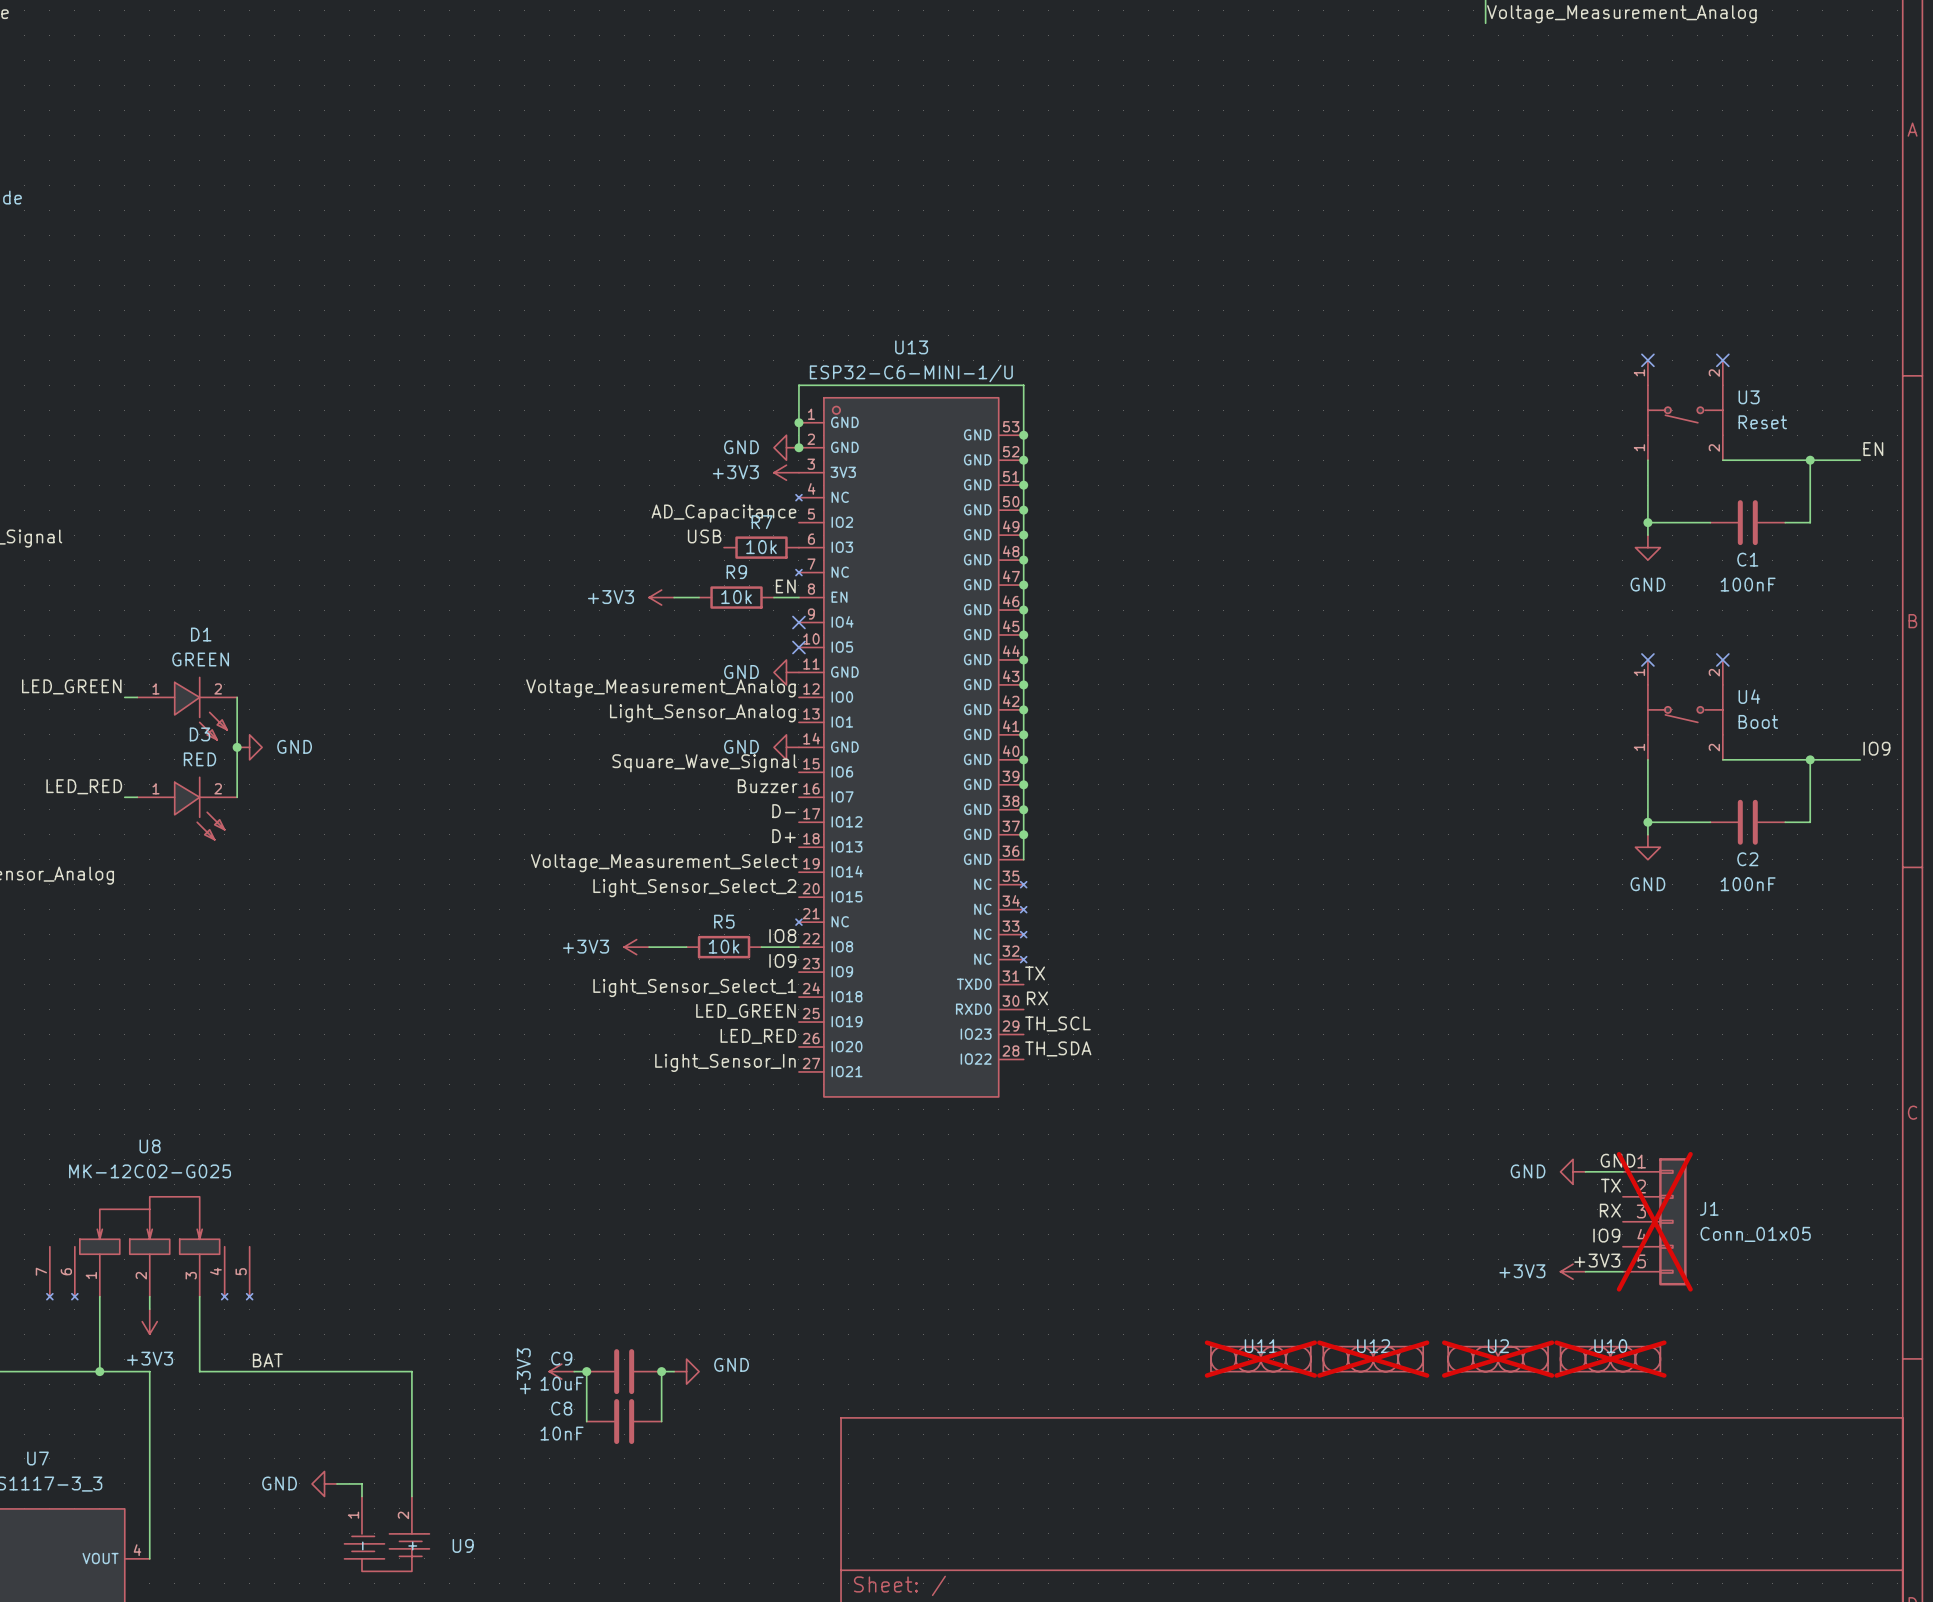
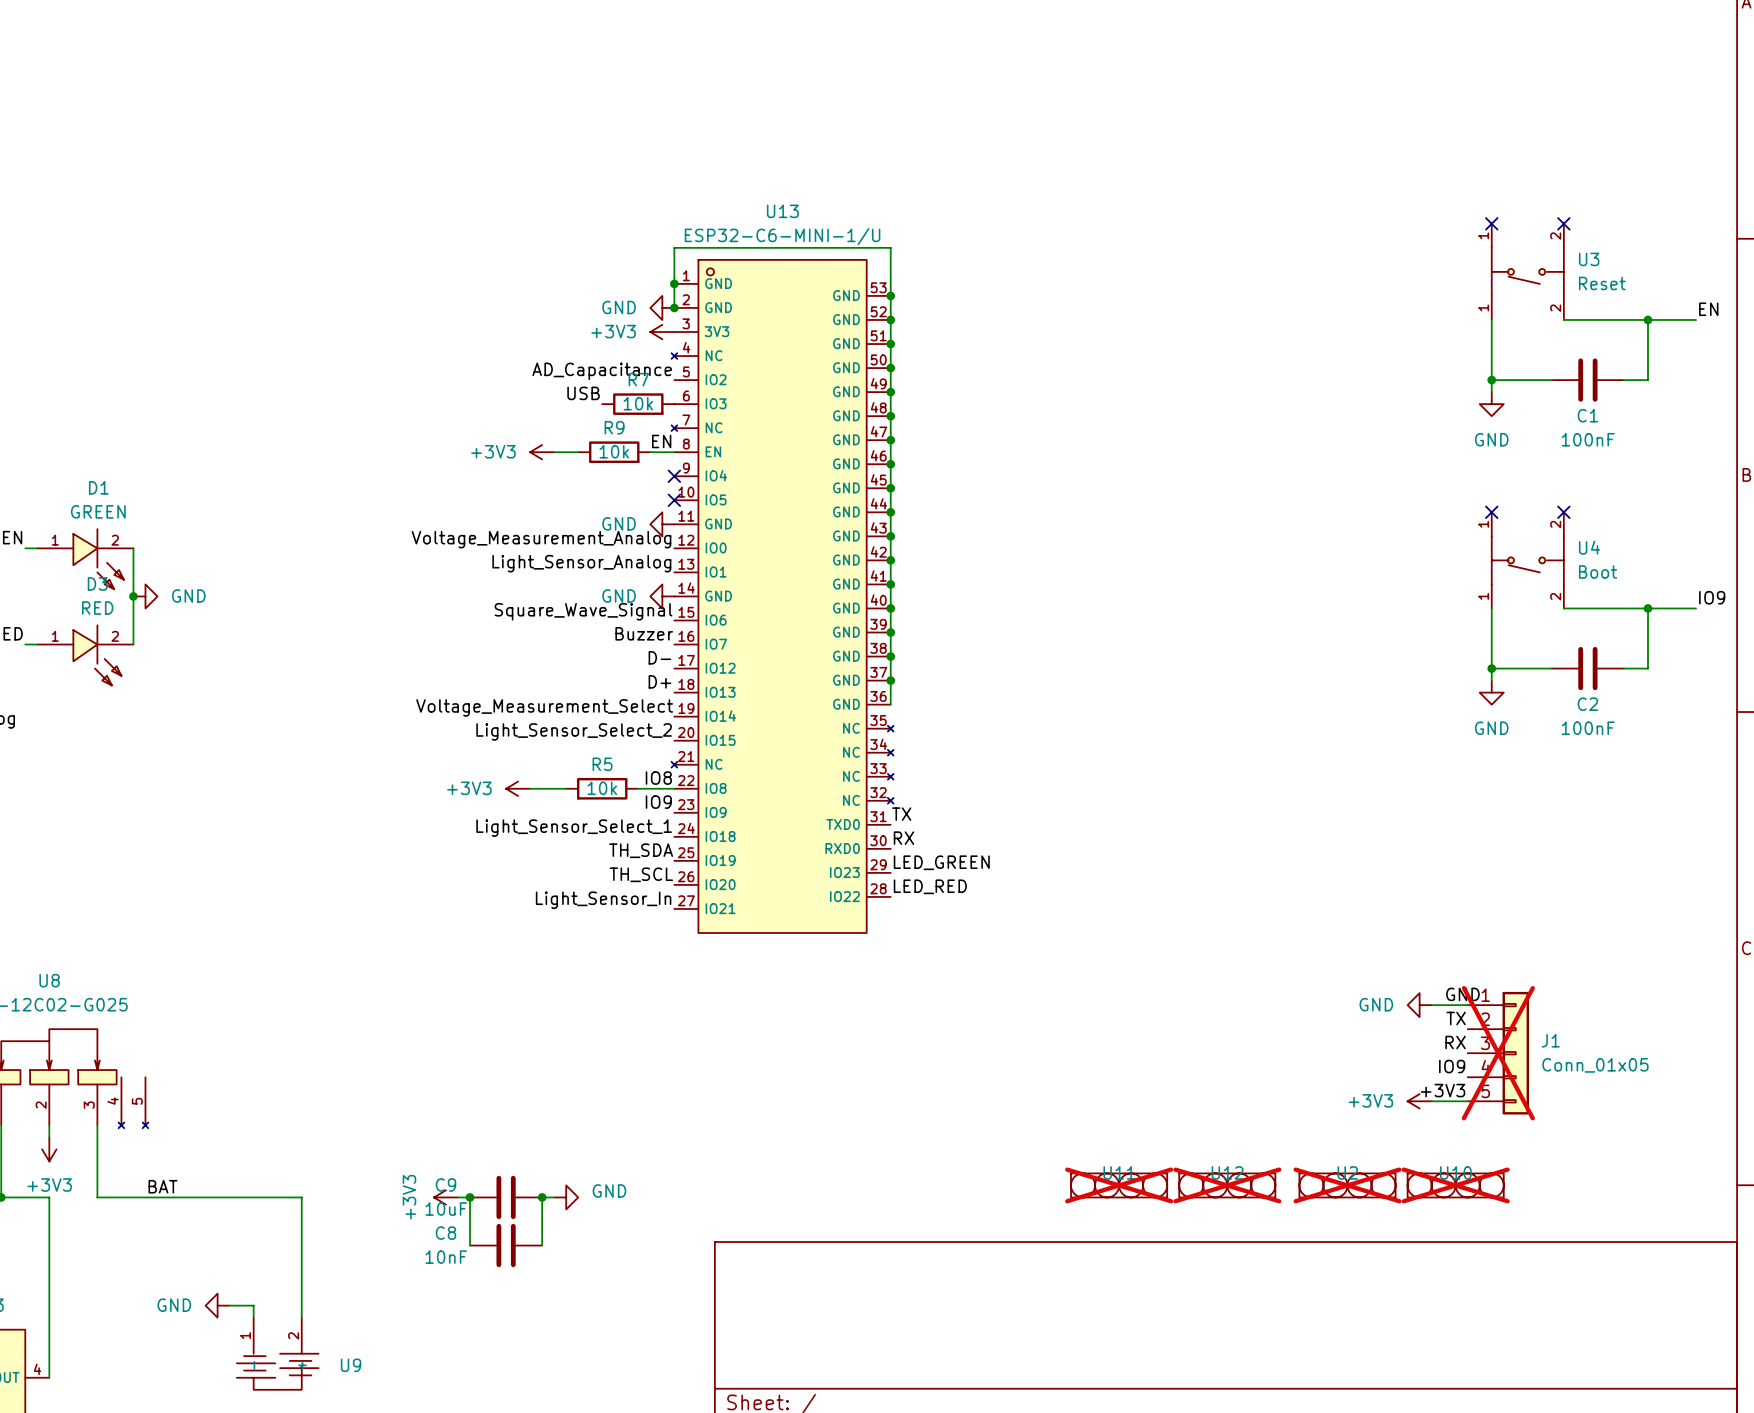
label: LED_GREEN (745, 1011) -> TH_SDA (641, 850)
label: TH_SCL (1057, 1023) -> LED_GREEN (941, 862)
label: LED_RED (758, 1036) -> TH_SCL (641, 874)
label: TH_SDA (1058, 1048) -> LED_RED (930, 886)

